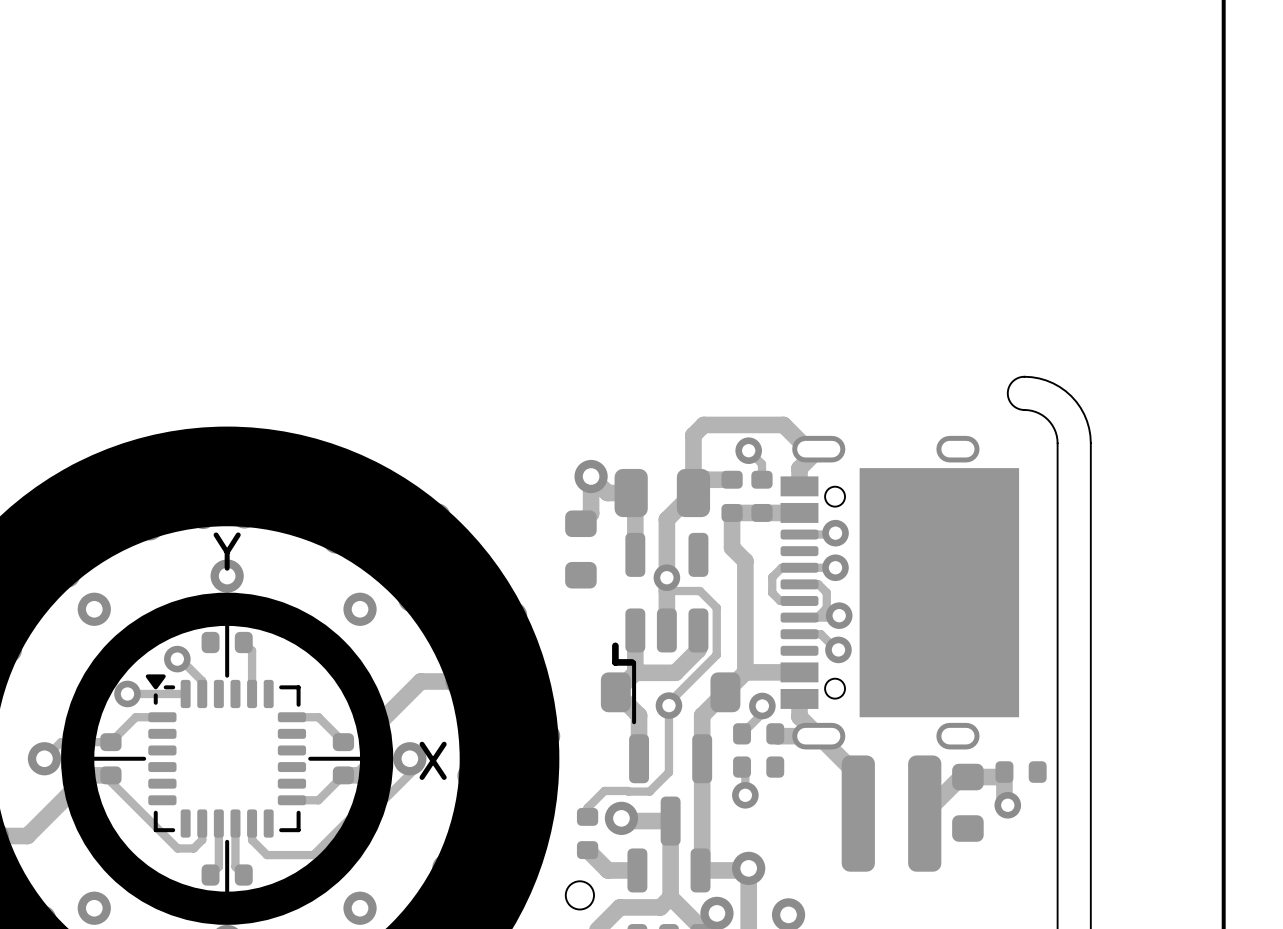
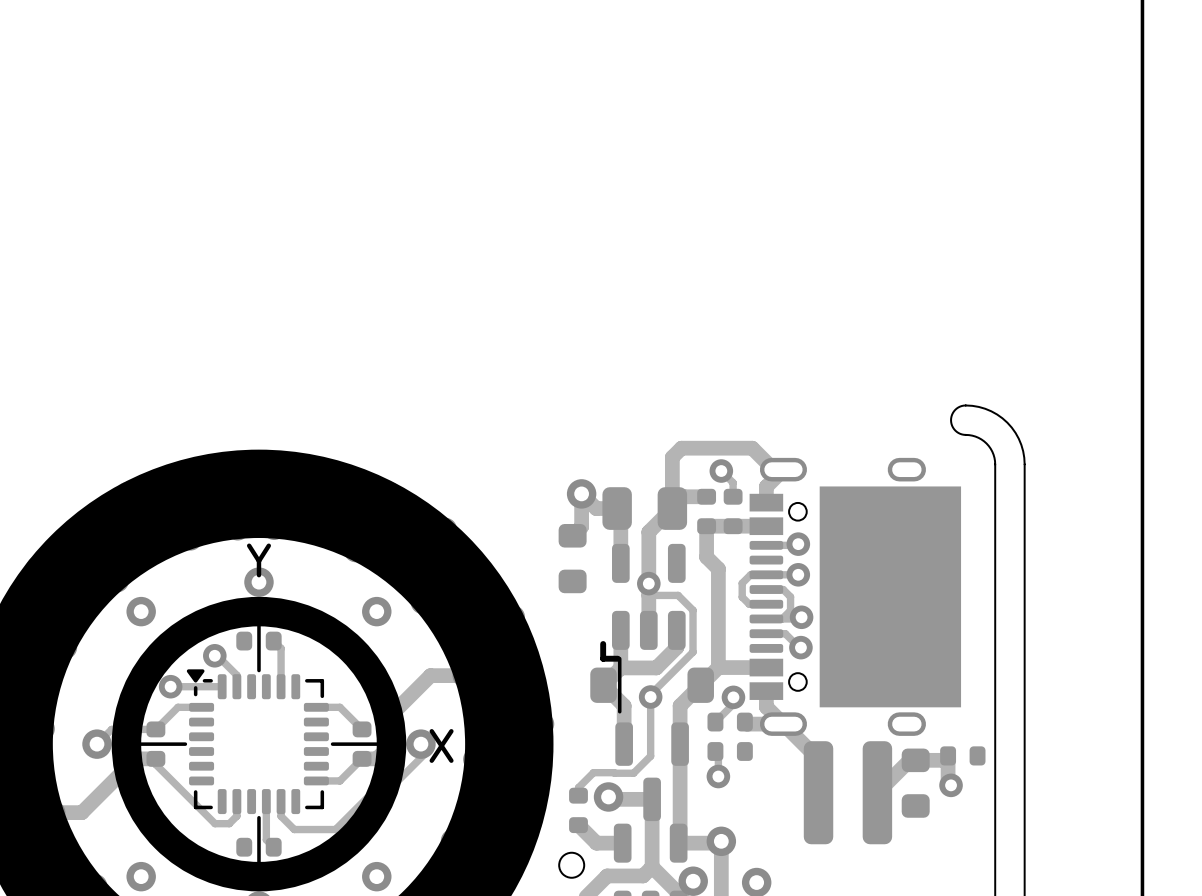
track: (218, 823) (218, 866) (210, 875) -> none

